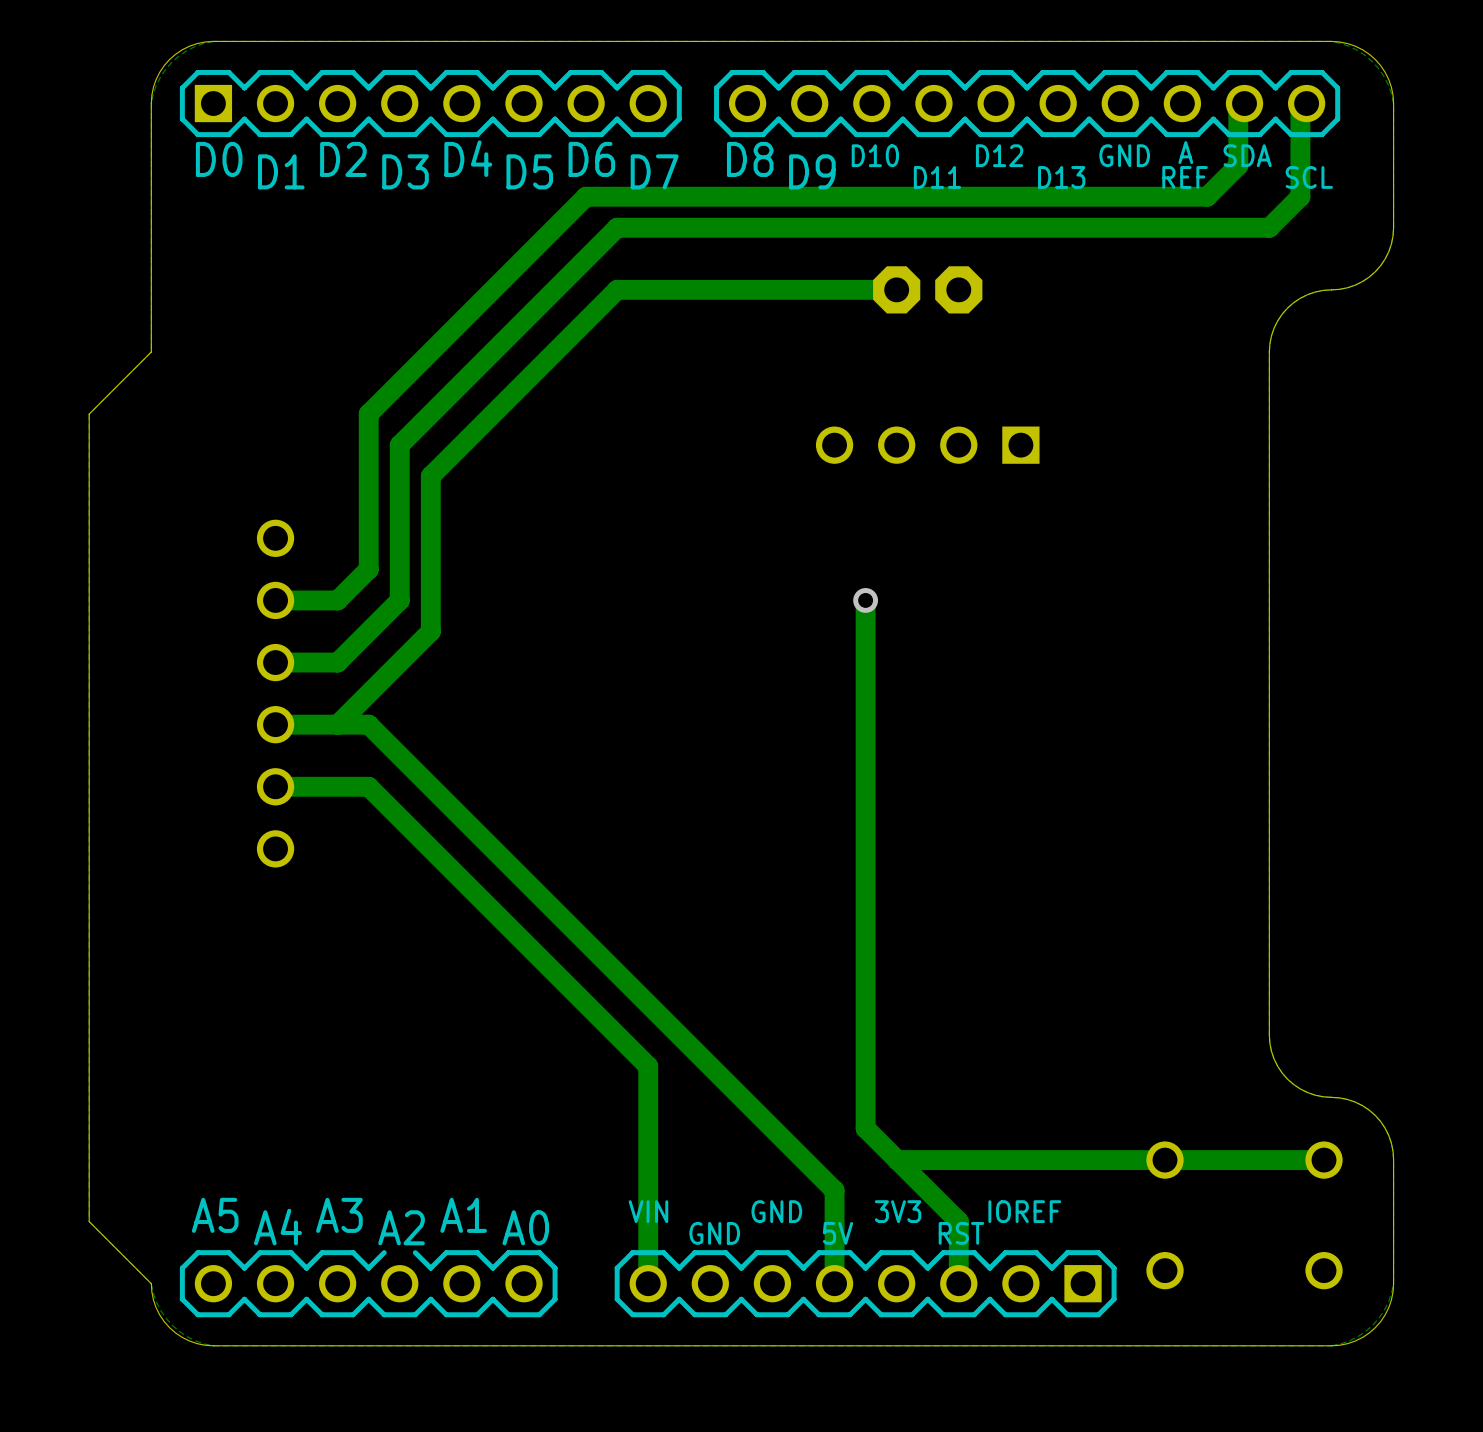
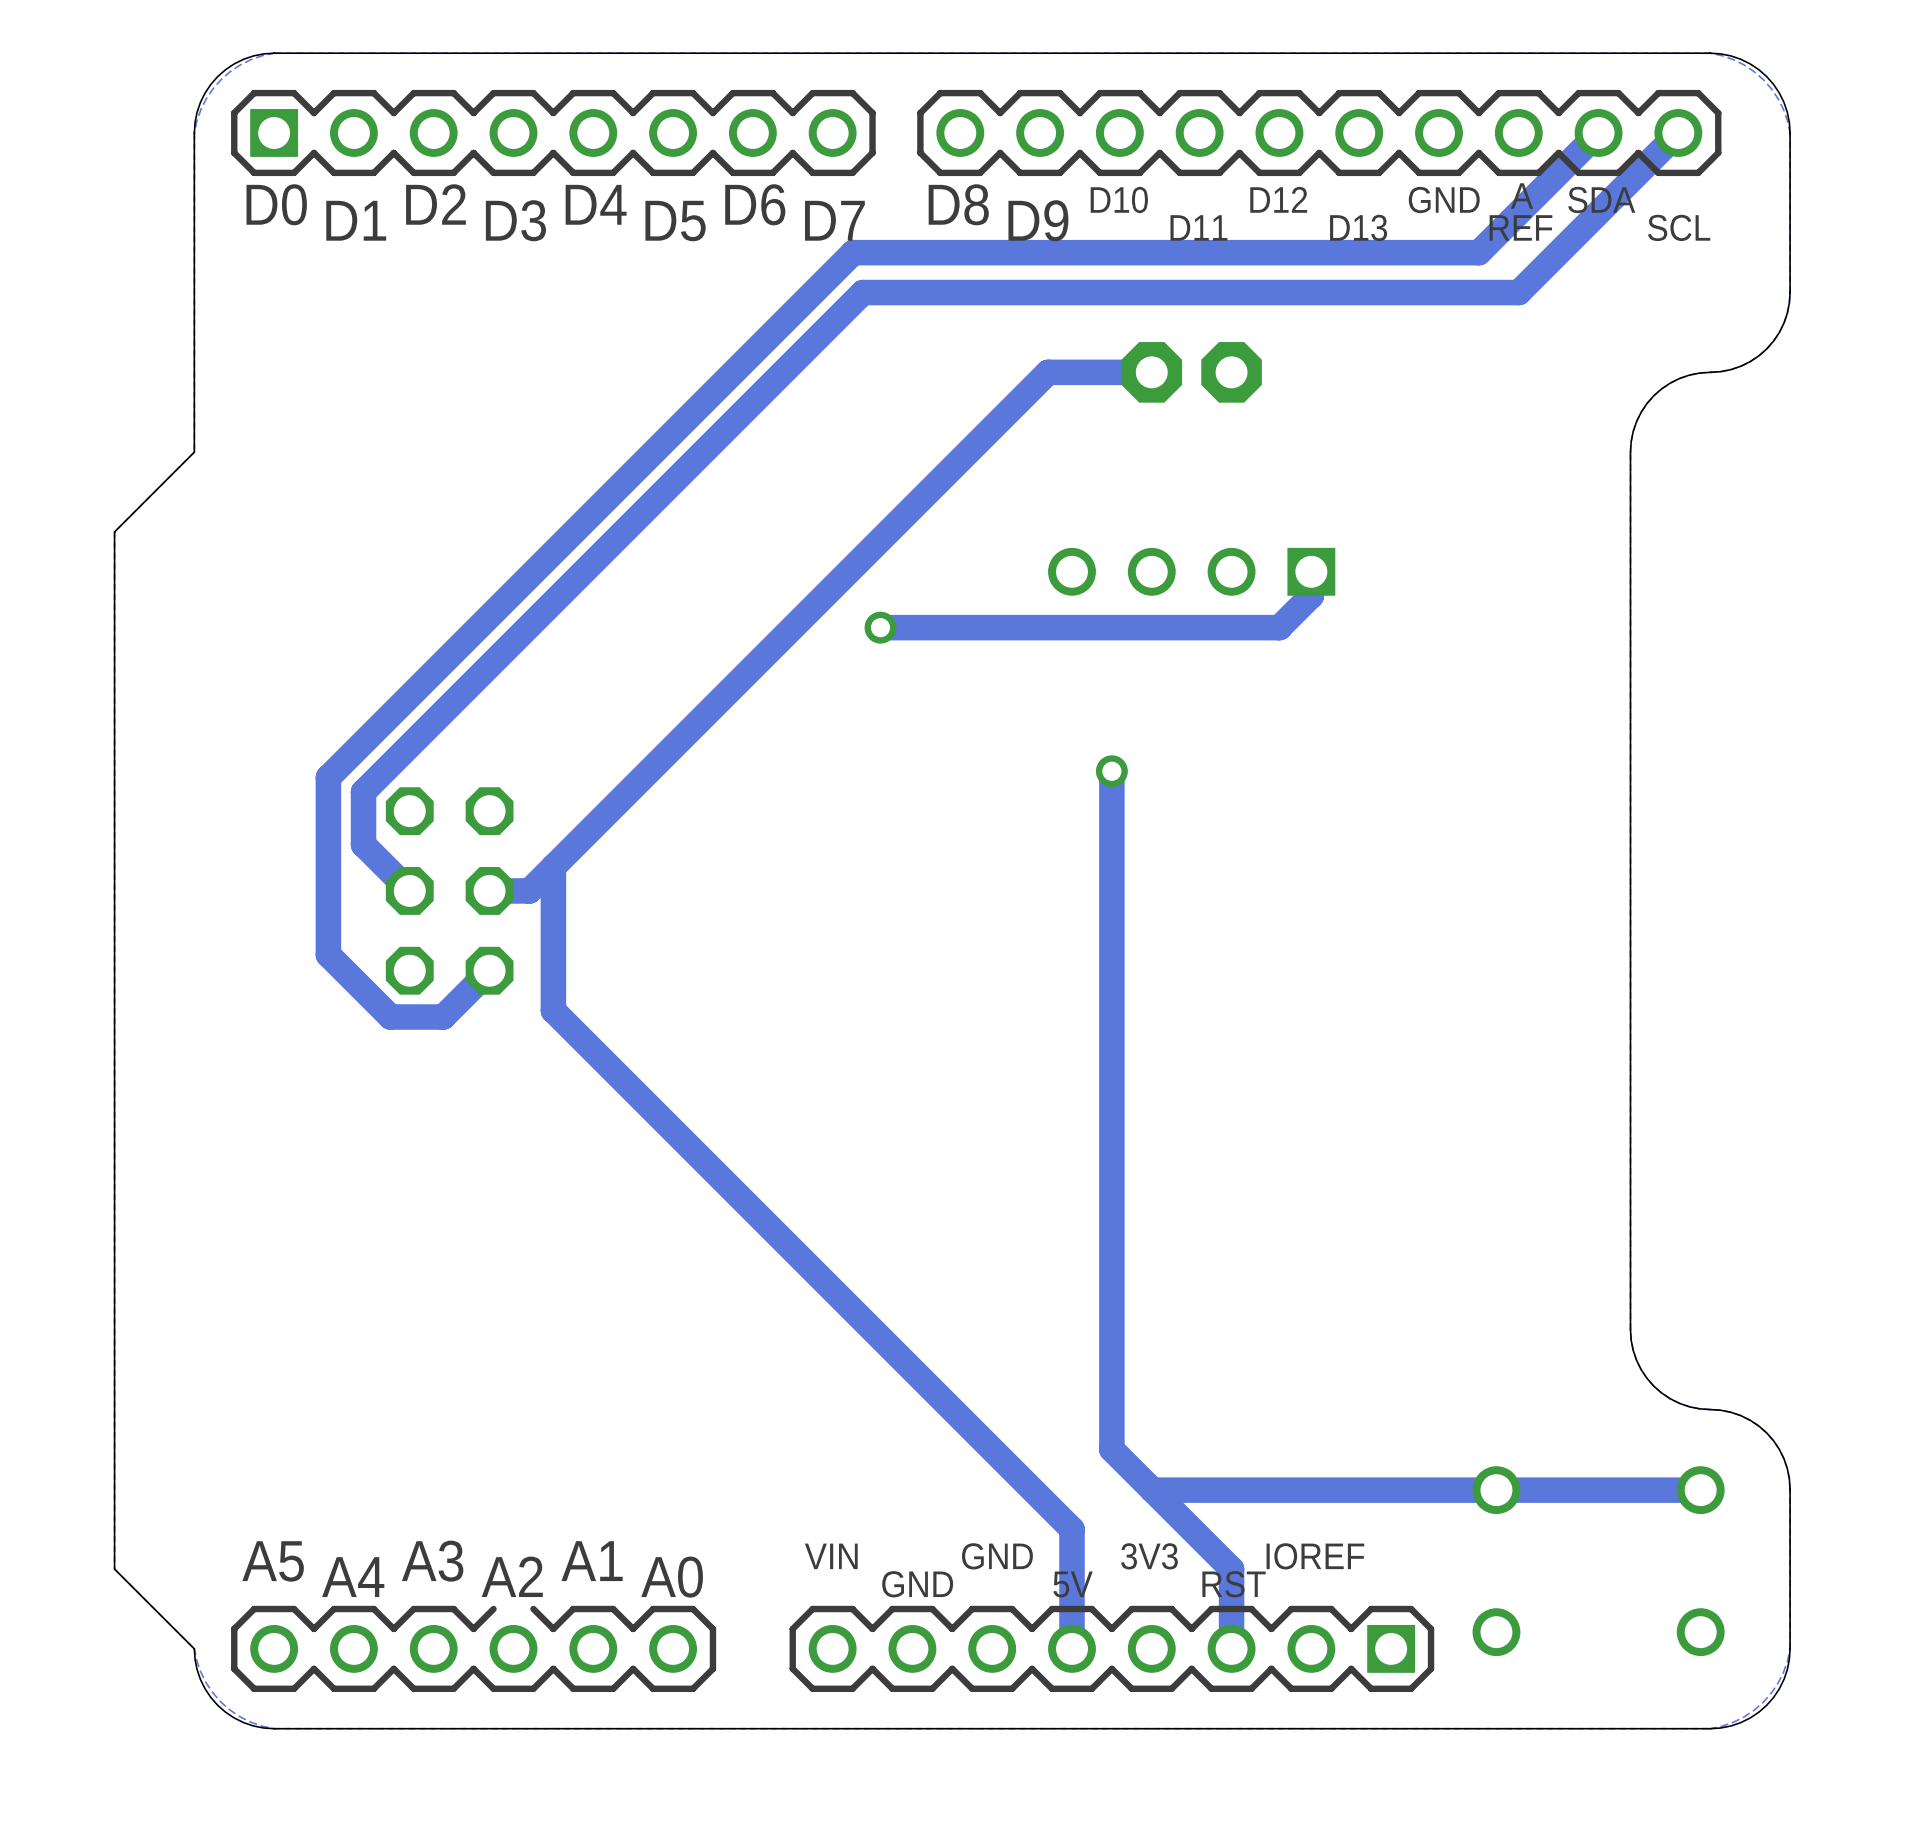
track: (1238, 109) (1238, 165) (1207, 196) (1151, 196) -> (1590, 140) (1478, 252)
track: (1300, 109) (1300, 196) (1269, 227) (1182, 227) -> (1670, 140) (1518, 292)
track: (664, 196) (586, 196) (368, 414) (368, 569) (337, 600) (275, 600) -> (853, 252) (328, 777) (328, 954) (390, 1017) (443, 1017) (489, 970)
track: (671, 227) (617, 227) (399, 445) (399, 600) (337, 662) (275, 662) -> (862, 292) (363, 791) (363, 844) (409, 890)
track: (815, 289) (617, 289) (430, 476) (430, 631) (337, 724) -> (1048, 372) (529, 890) (489, 890)
track: none -> (1311, 571) (1311, 595) (1279, 627) (880, 627)
via: none -> (880, 627)
part: (275, 693) -> none
part: none -> (449, 890)
track: (275, 724) (368, 724) (430, 786) -> (553, 867) (553, 1010)
track: (275, 786) (368, 786) (648, 1066) (648, 1283) -> none

